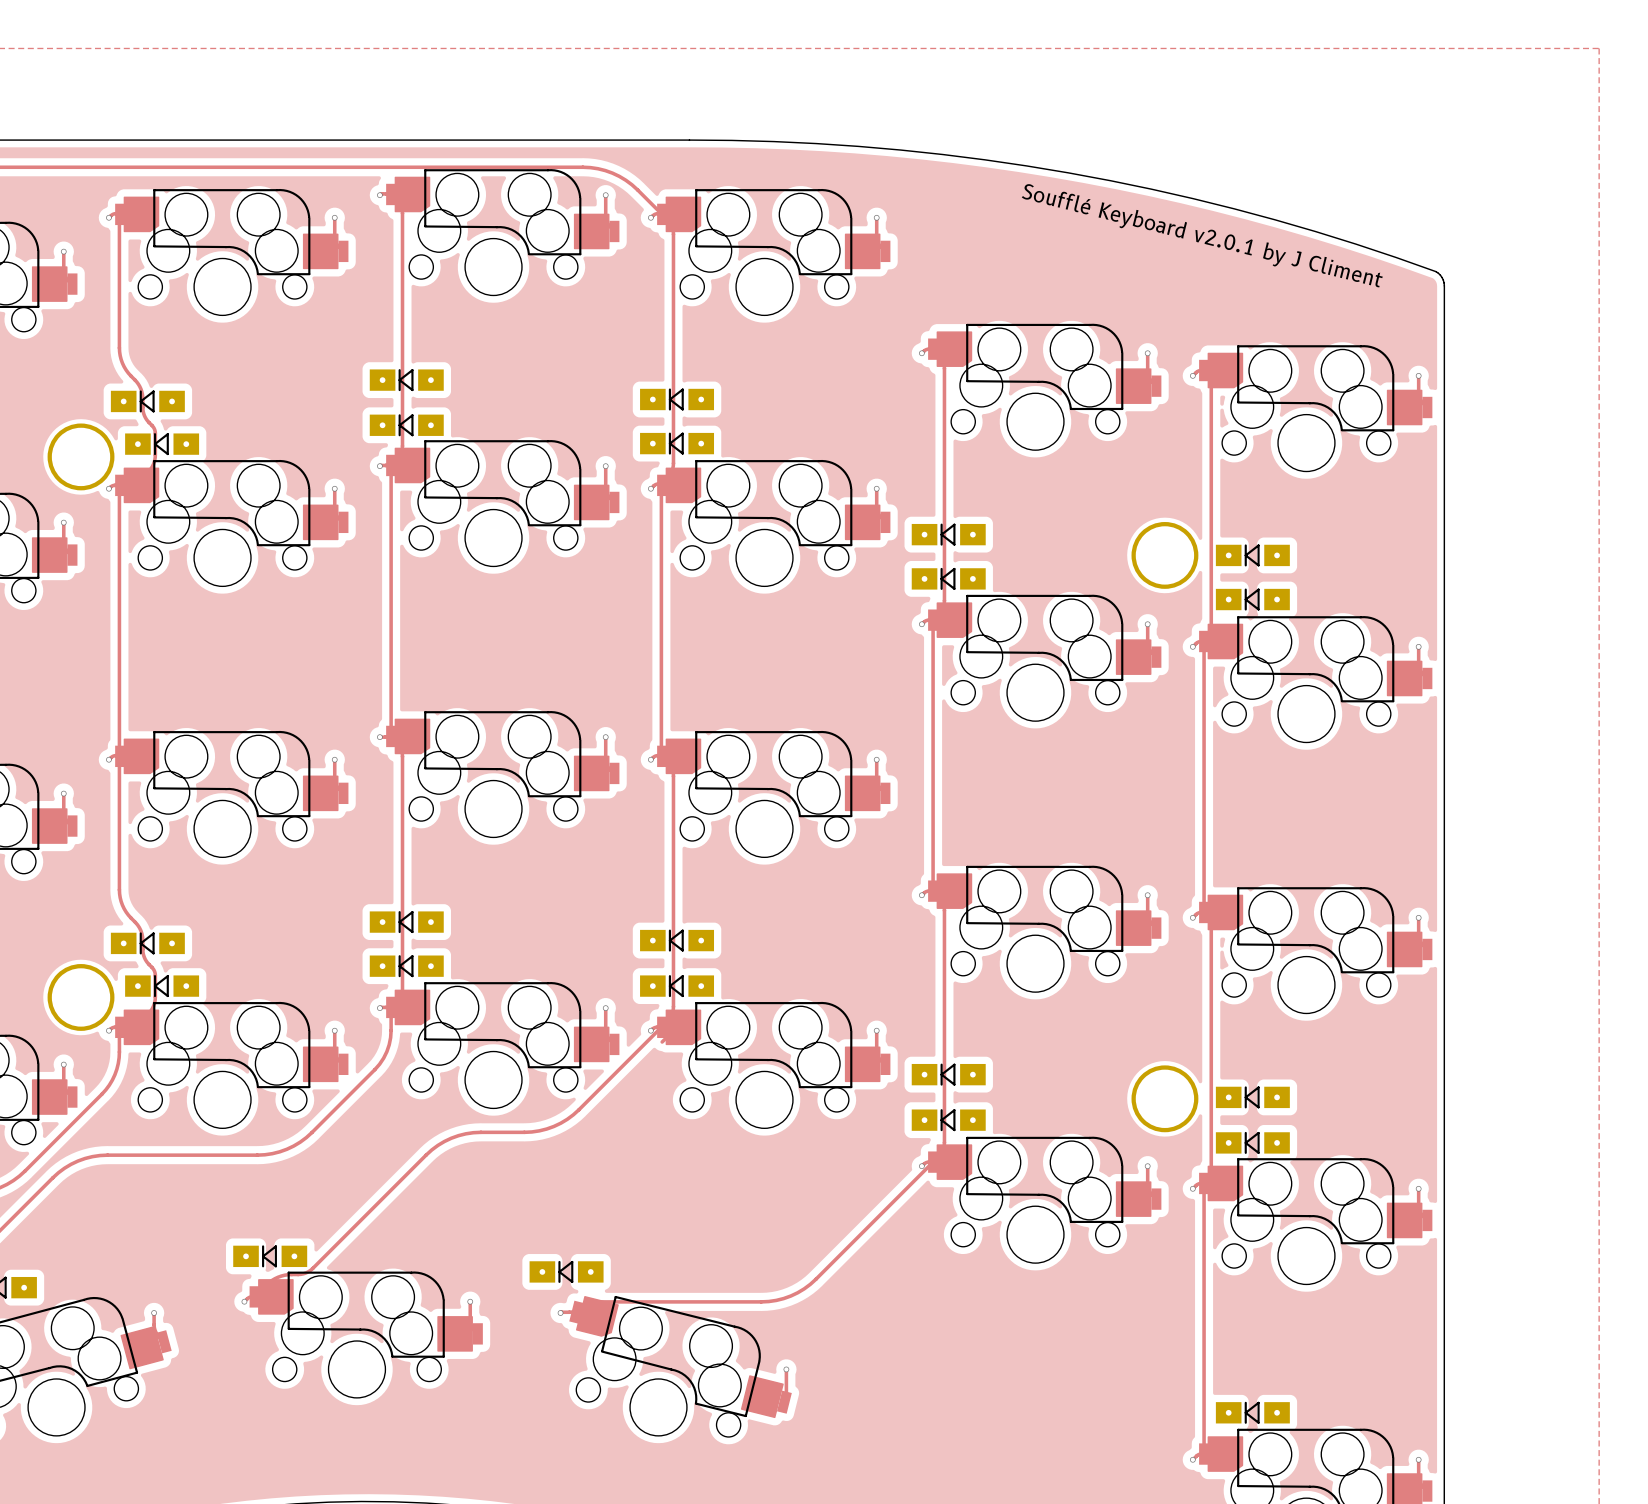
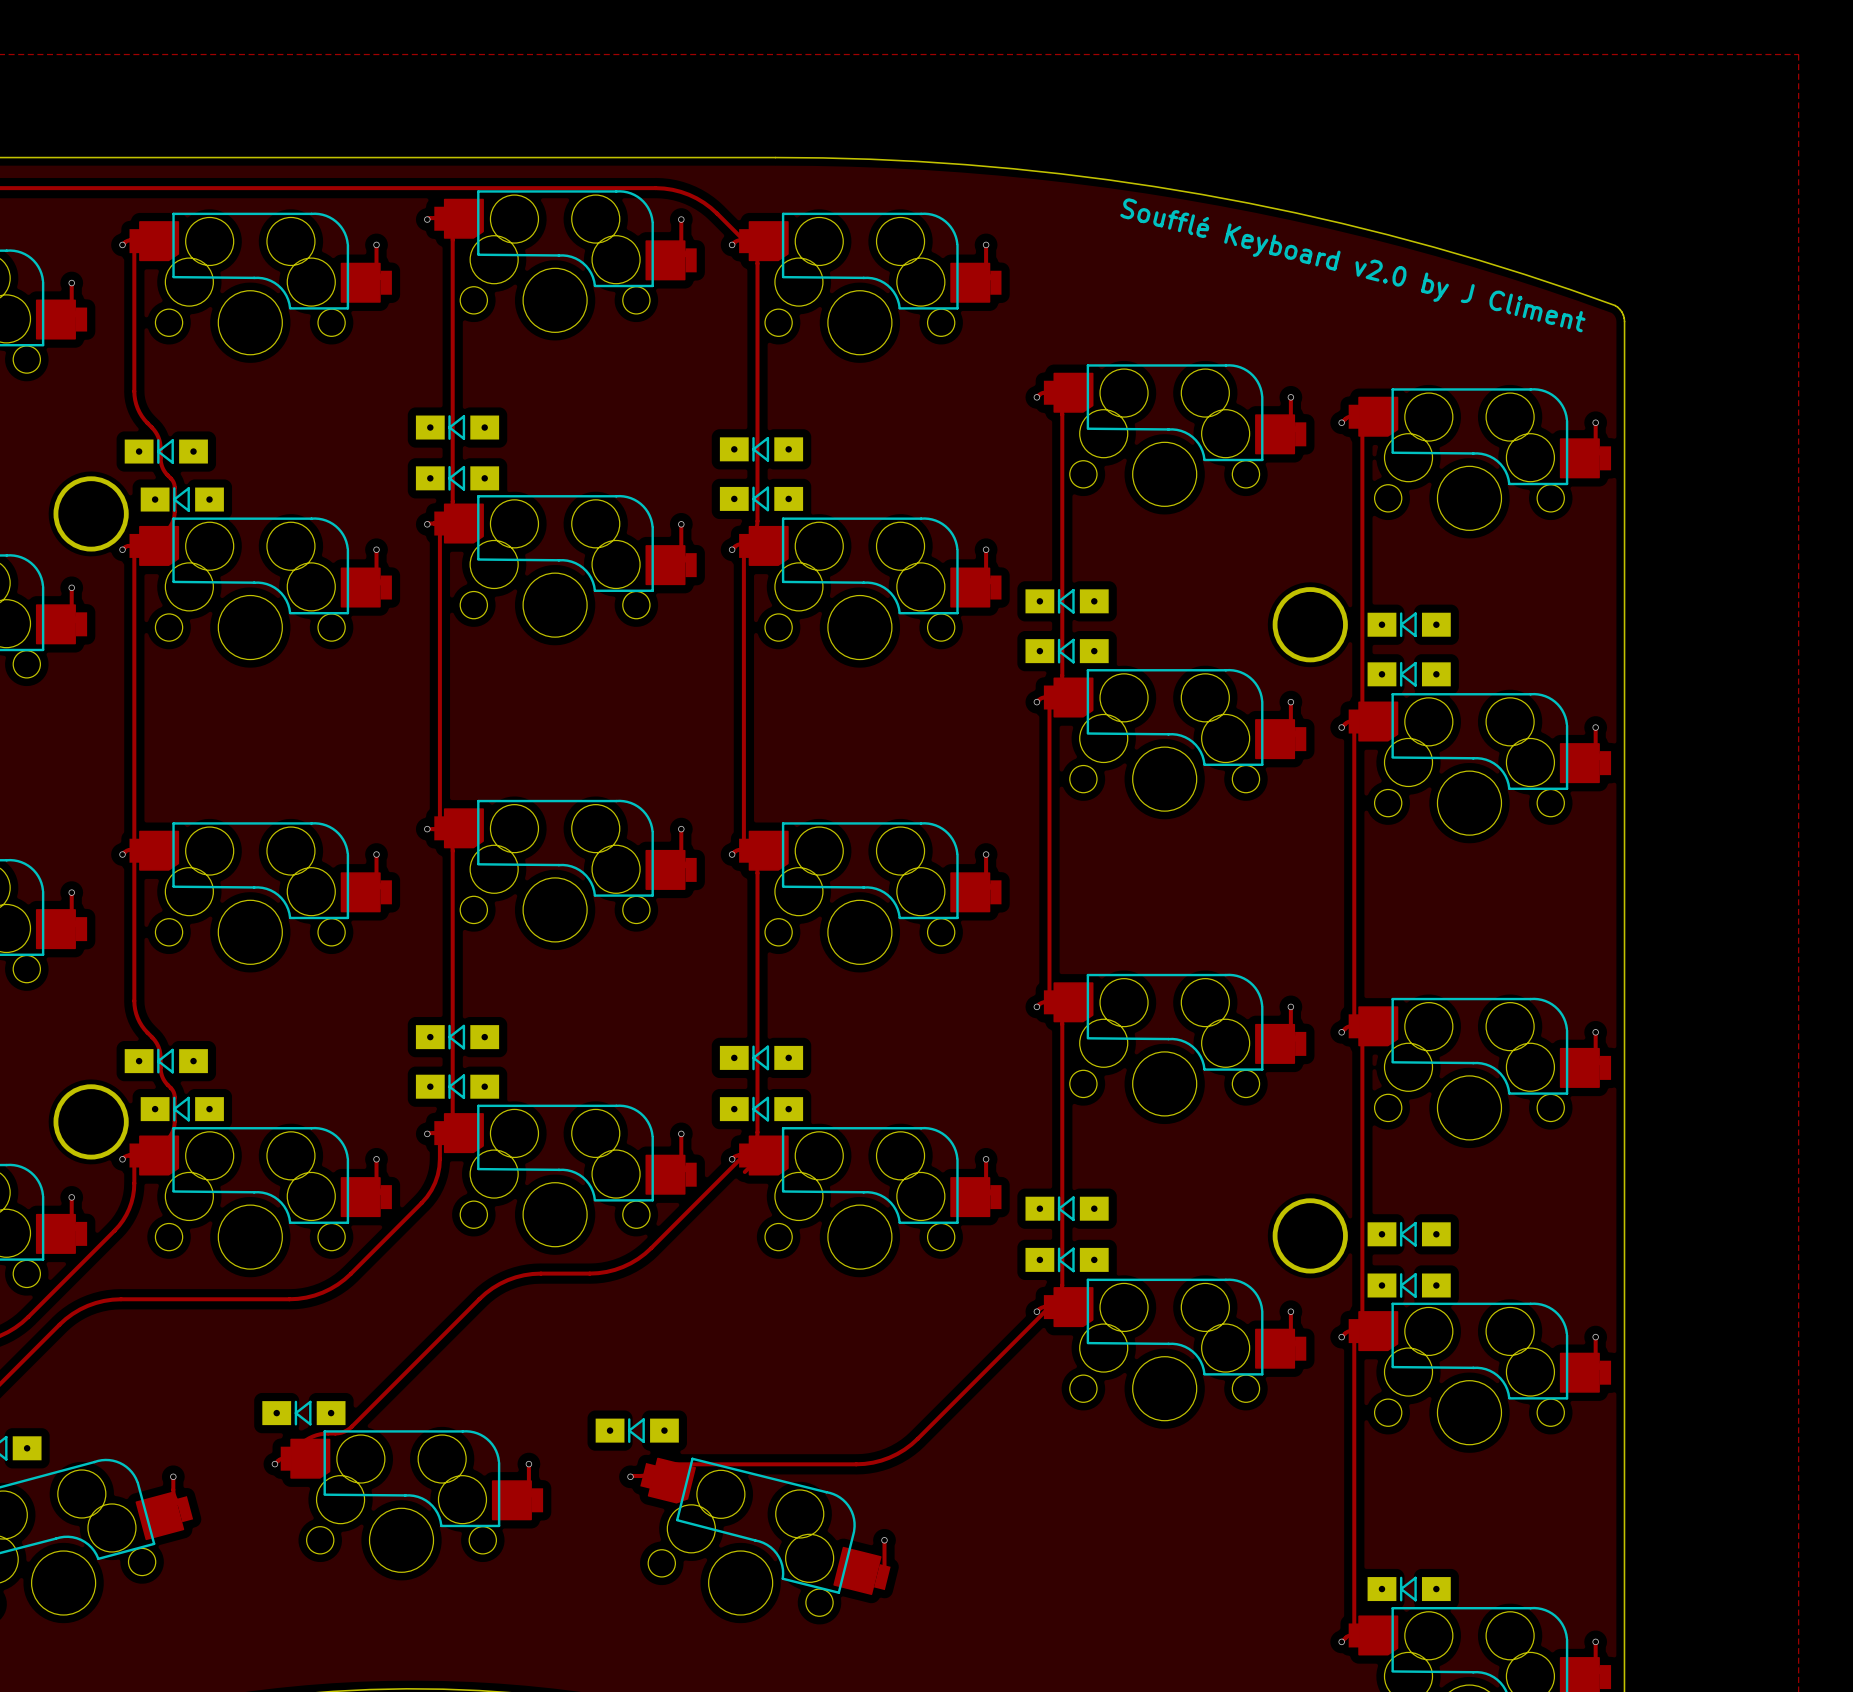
text: Soufflé Keyboard v2.0.1 by J Climent (1202, 235) -> Soufflé Keyboard v2.0 by J Climent (1352, 265)

